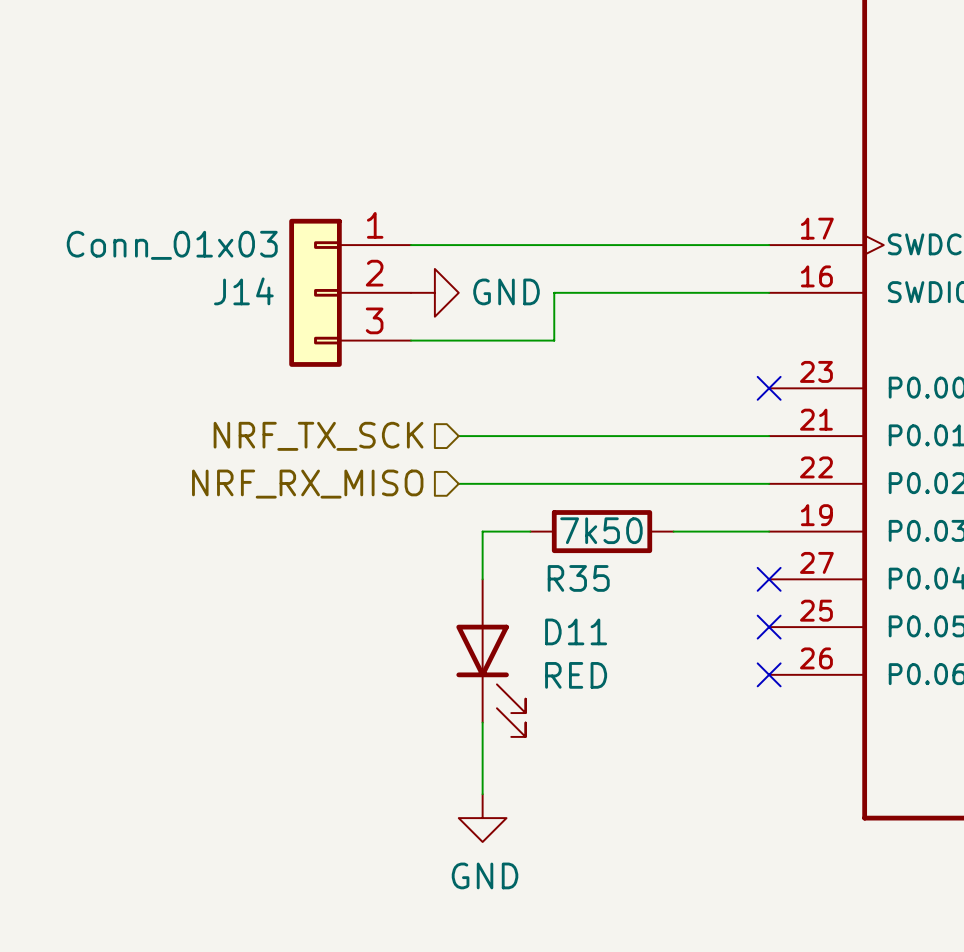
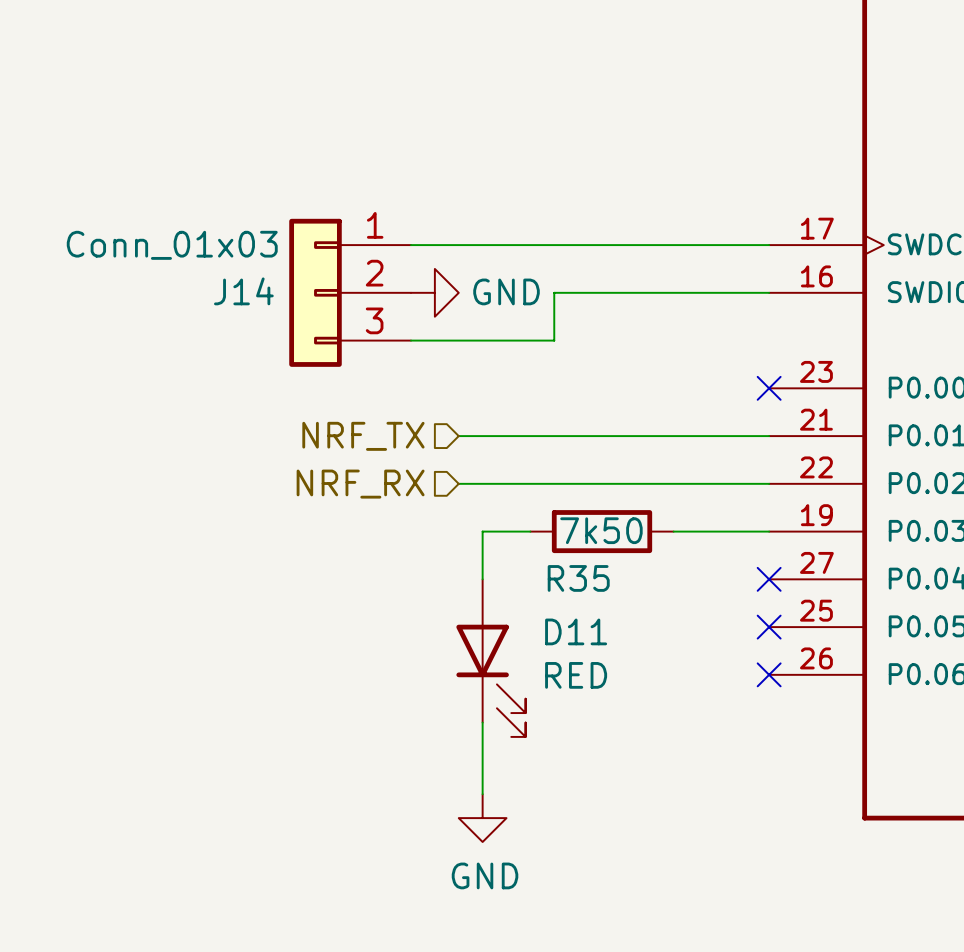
hierarchical label: NRF_TX_SCK (318, 436) -> NRF_TX (363, 436)
hierarchical label: NRF_RX_MISO (307, 484) -> NRF_RX (360, 484)

